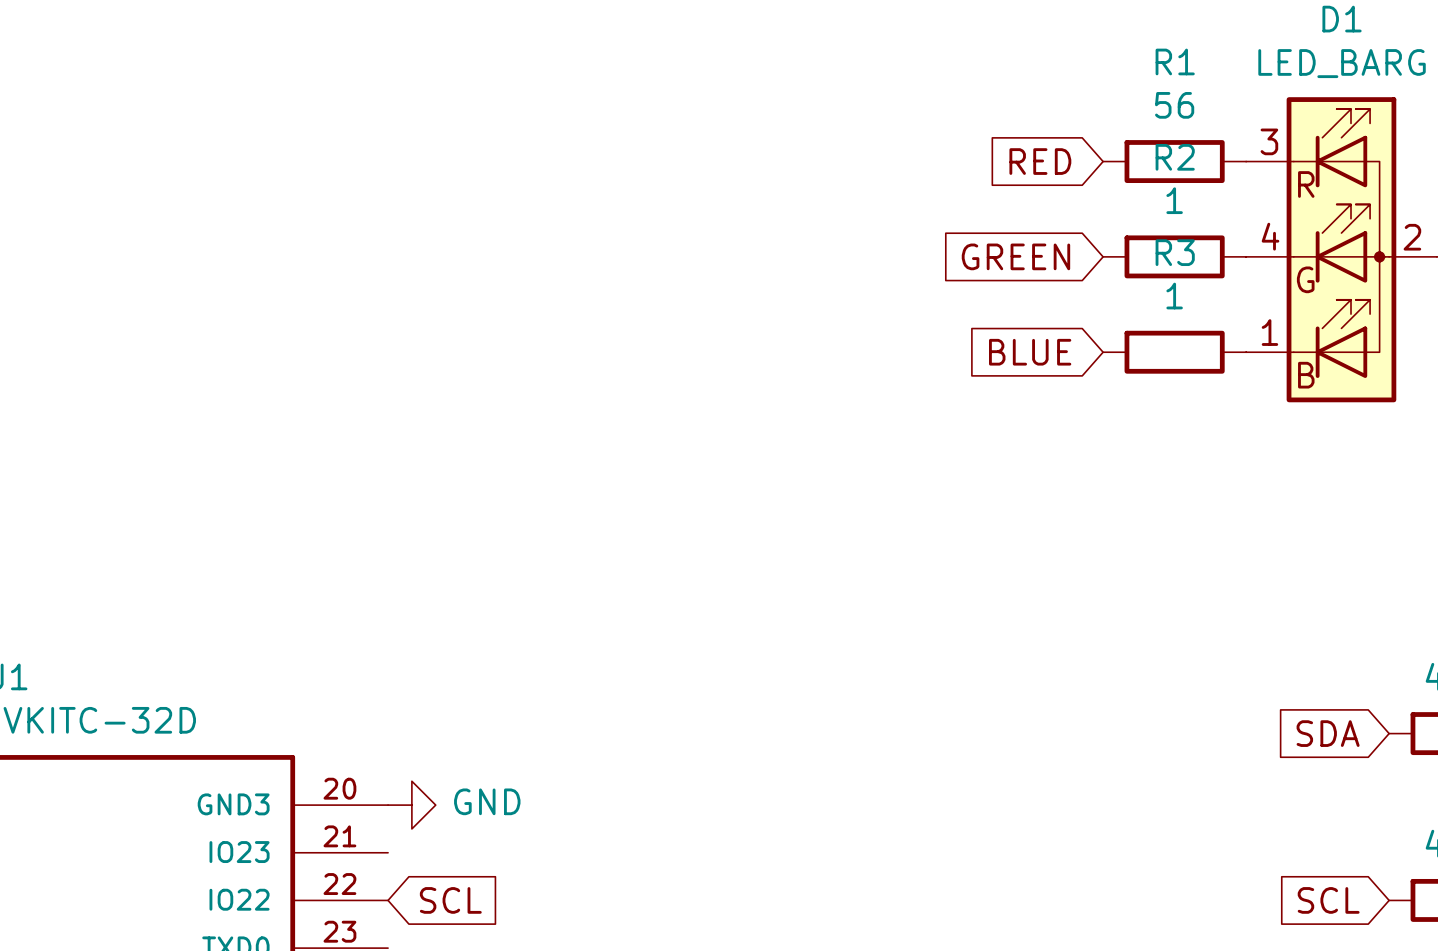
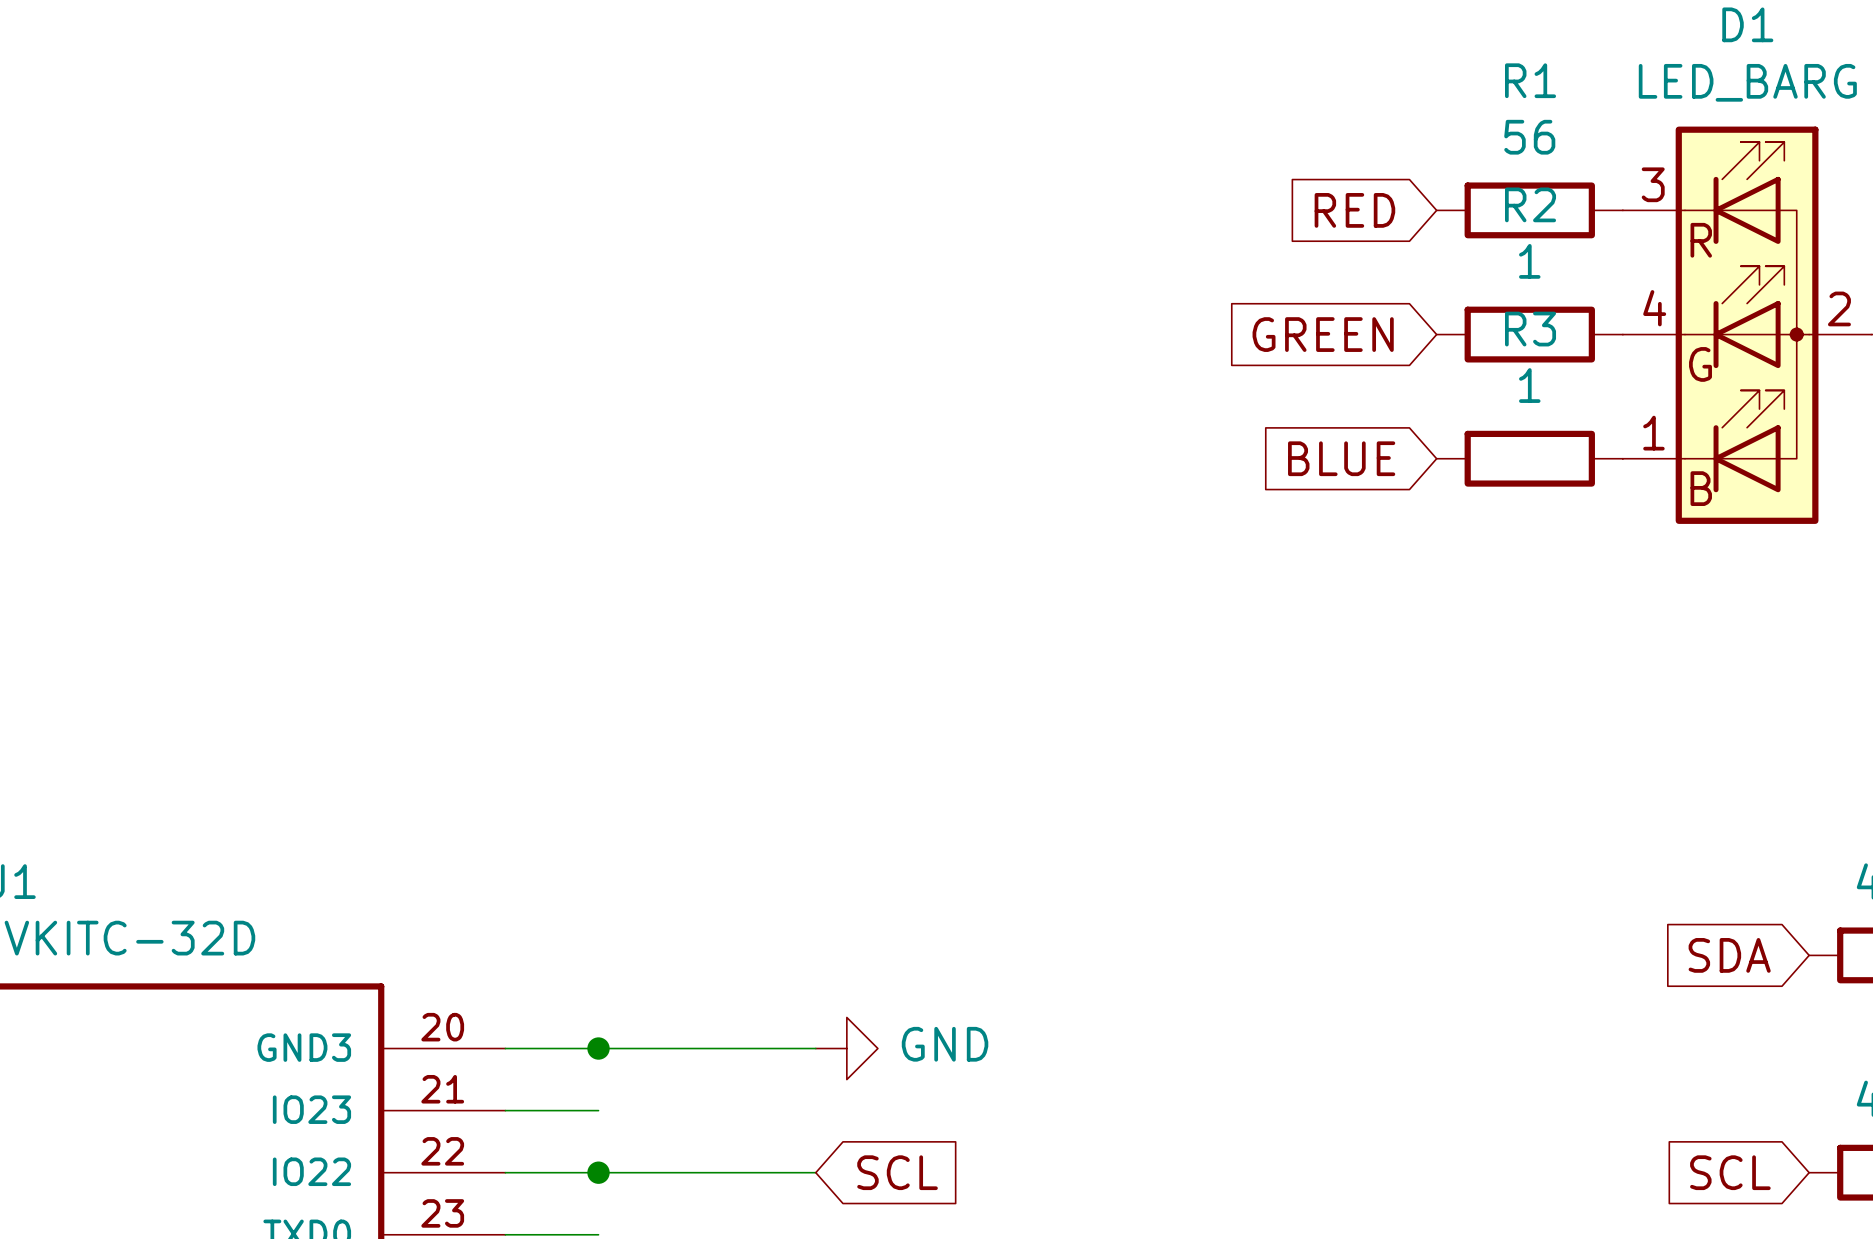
wire: none -> (505, 1048) (815, 1048)
power symbol position: GND (411, 805) -> GND (846, 1048)
junction: none -> (598, 1048)
wire: none -> (505, 1110) (598, 1110)
wire: none -> (505, 1172) (815, 1172)
global label position: SCL (450, 900) -> SCL (897, 1172)
junction: none -> (598, 1172)
wire: none -> (505, 1234) (598, 1234)

